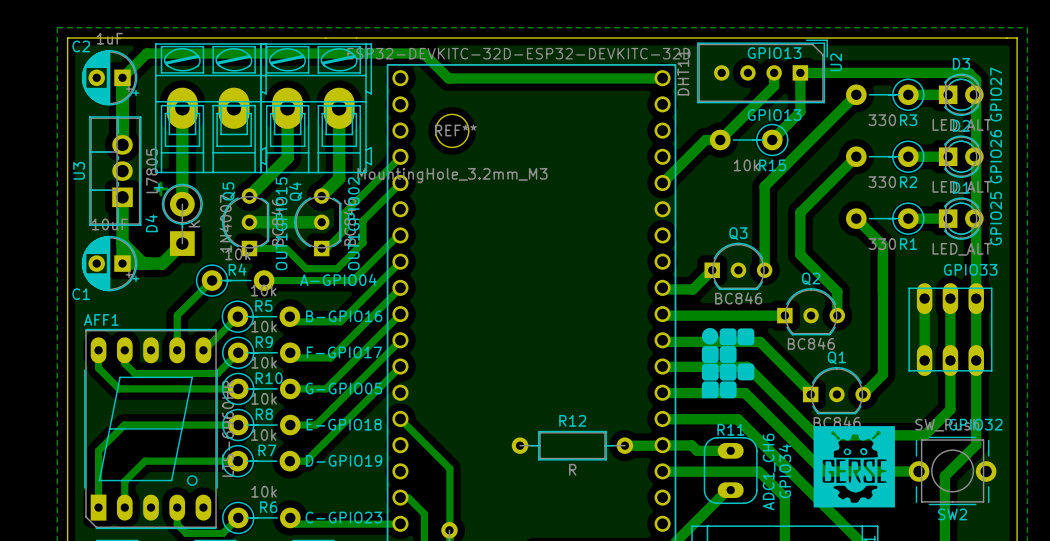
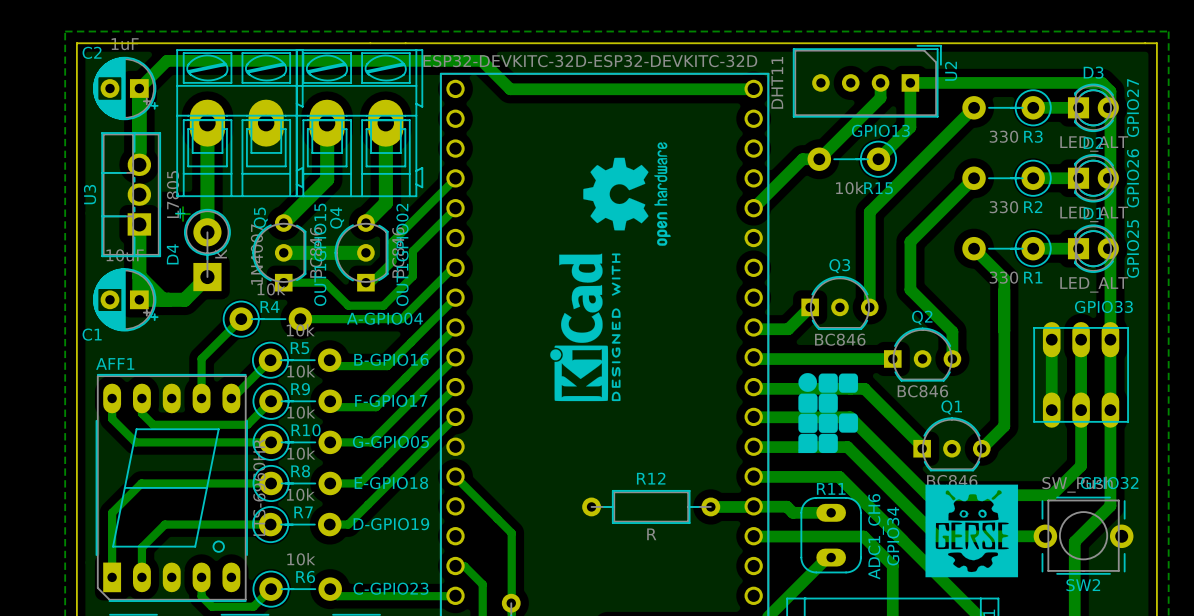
text: GPIO13 (774, 53) -> none
drawing: none -> [550, 142, 671, 402]
REF**: MountingHole_3.2mm_M3 (452, 130) -> none

